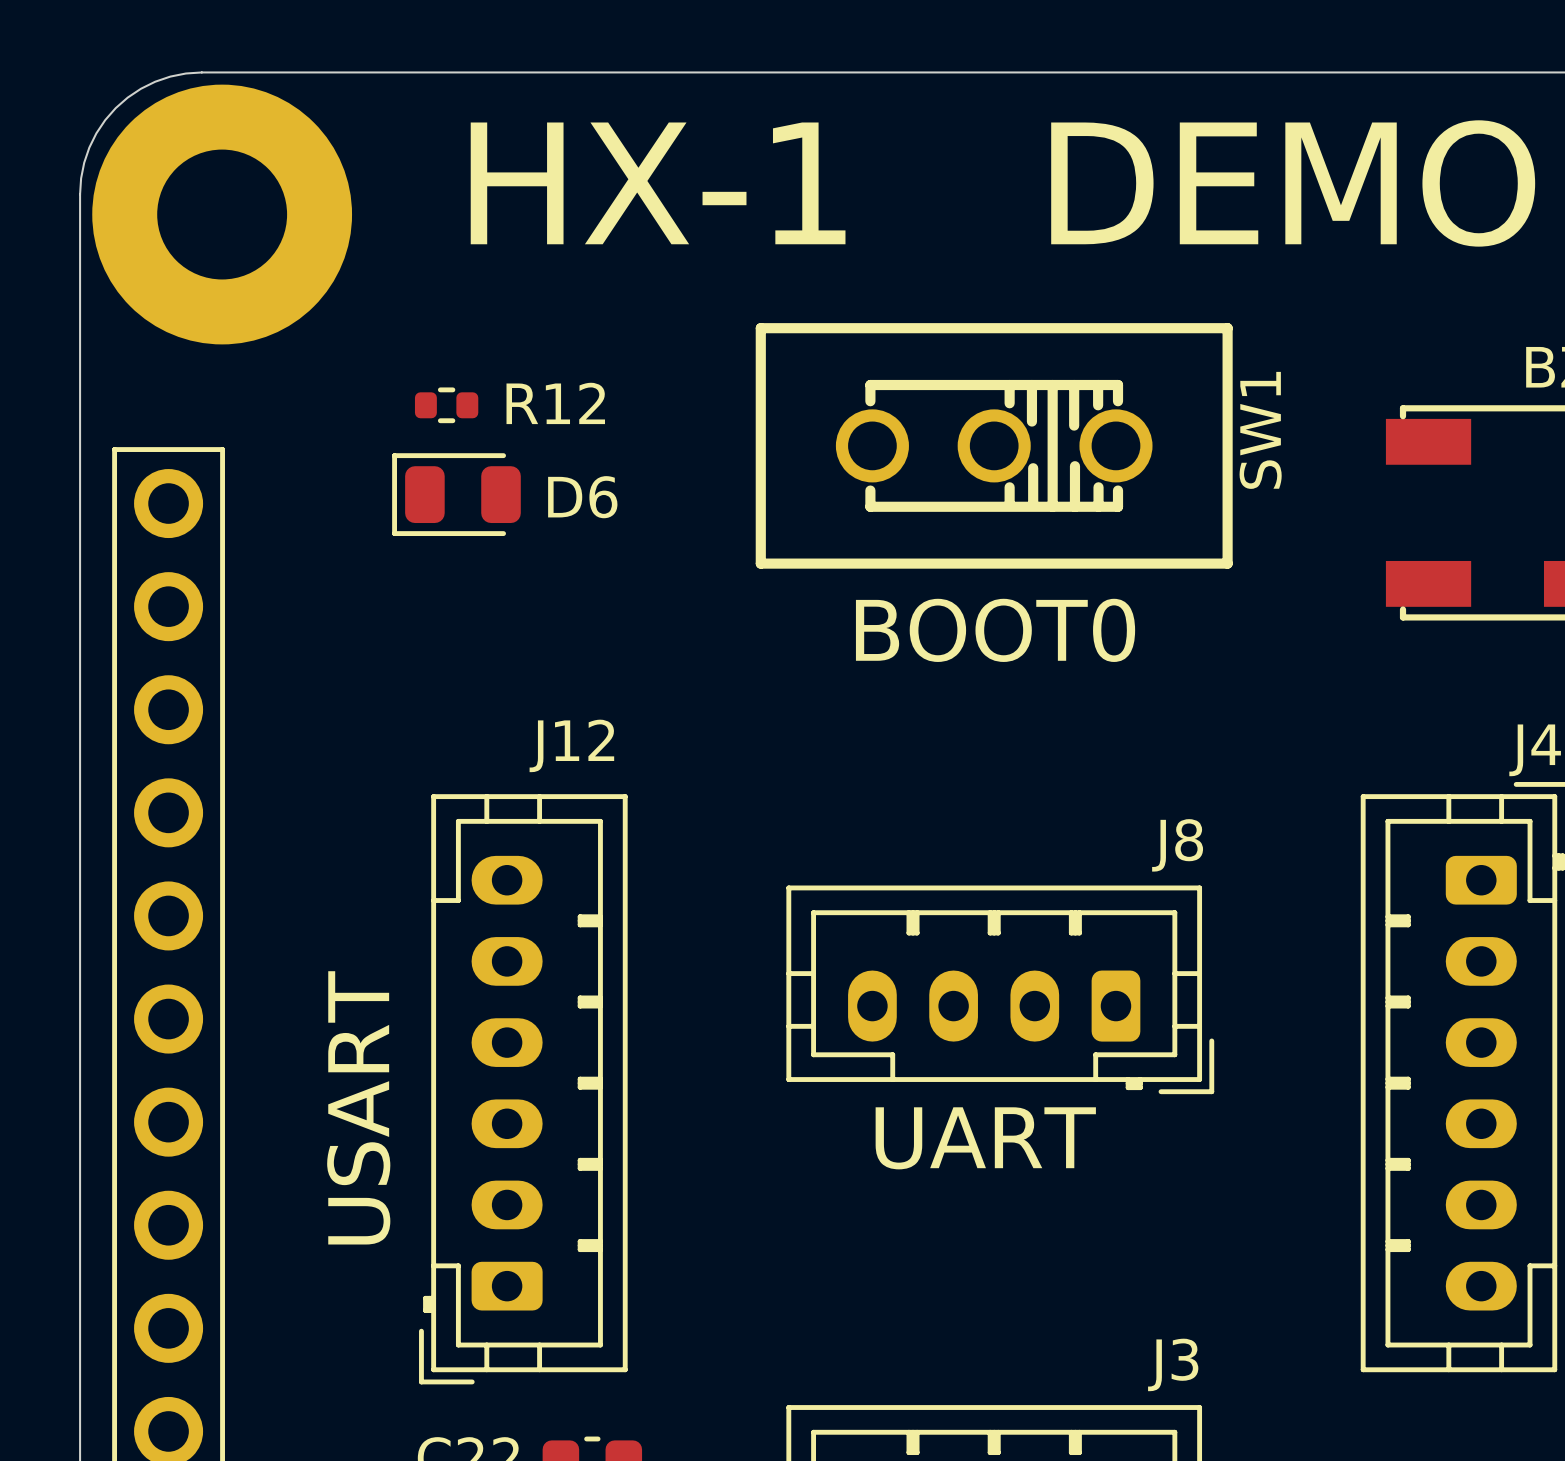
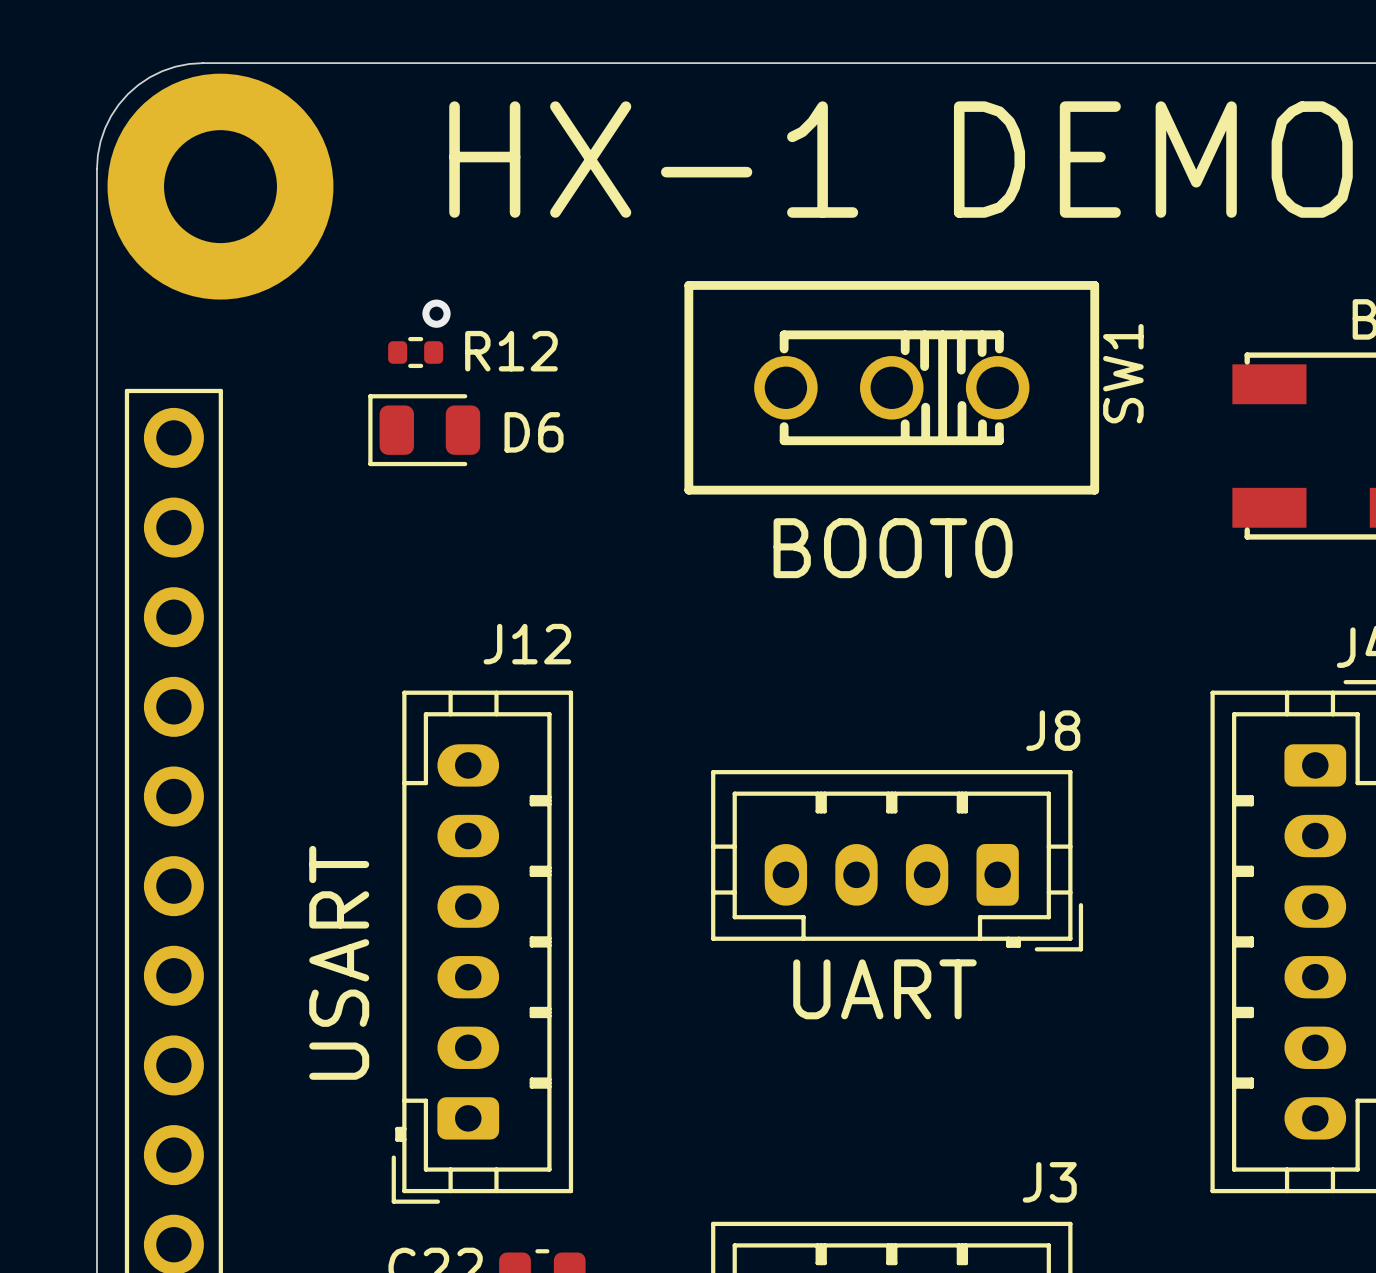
via: none -> (436, 313)

